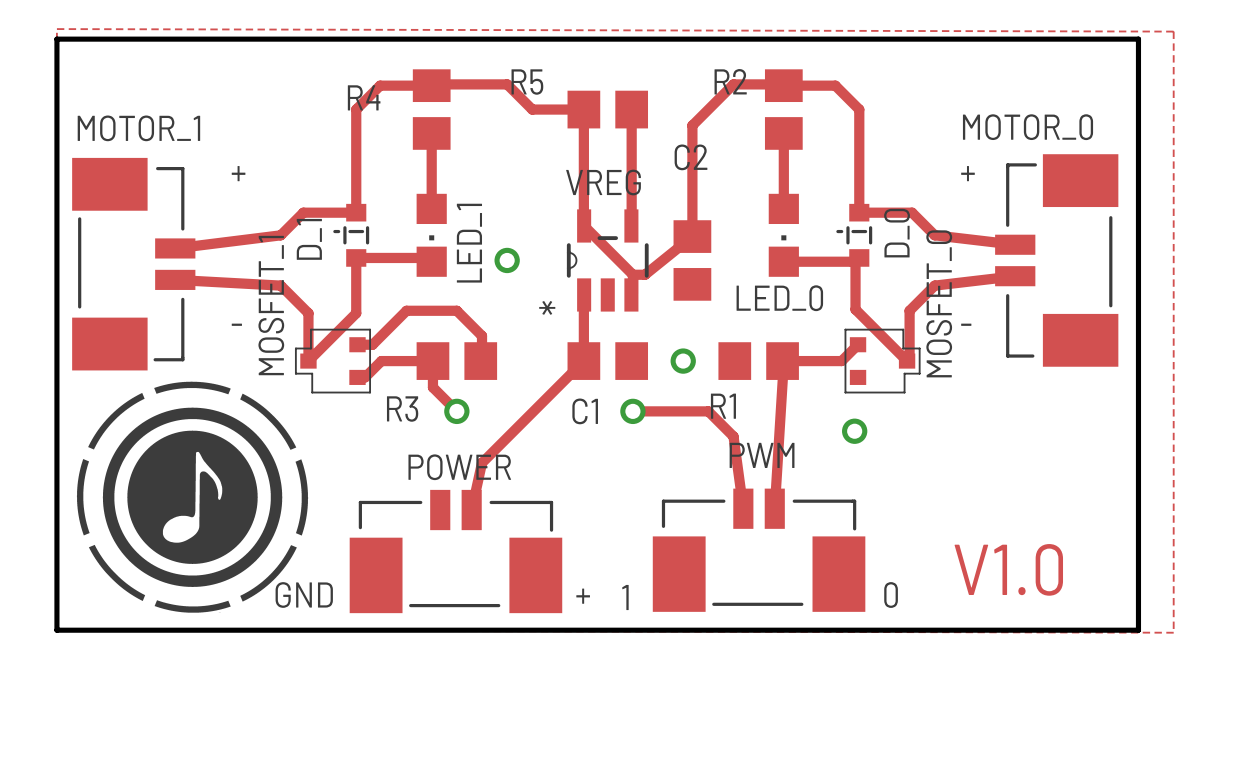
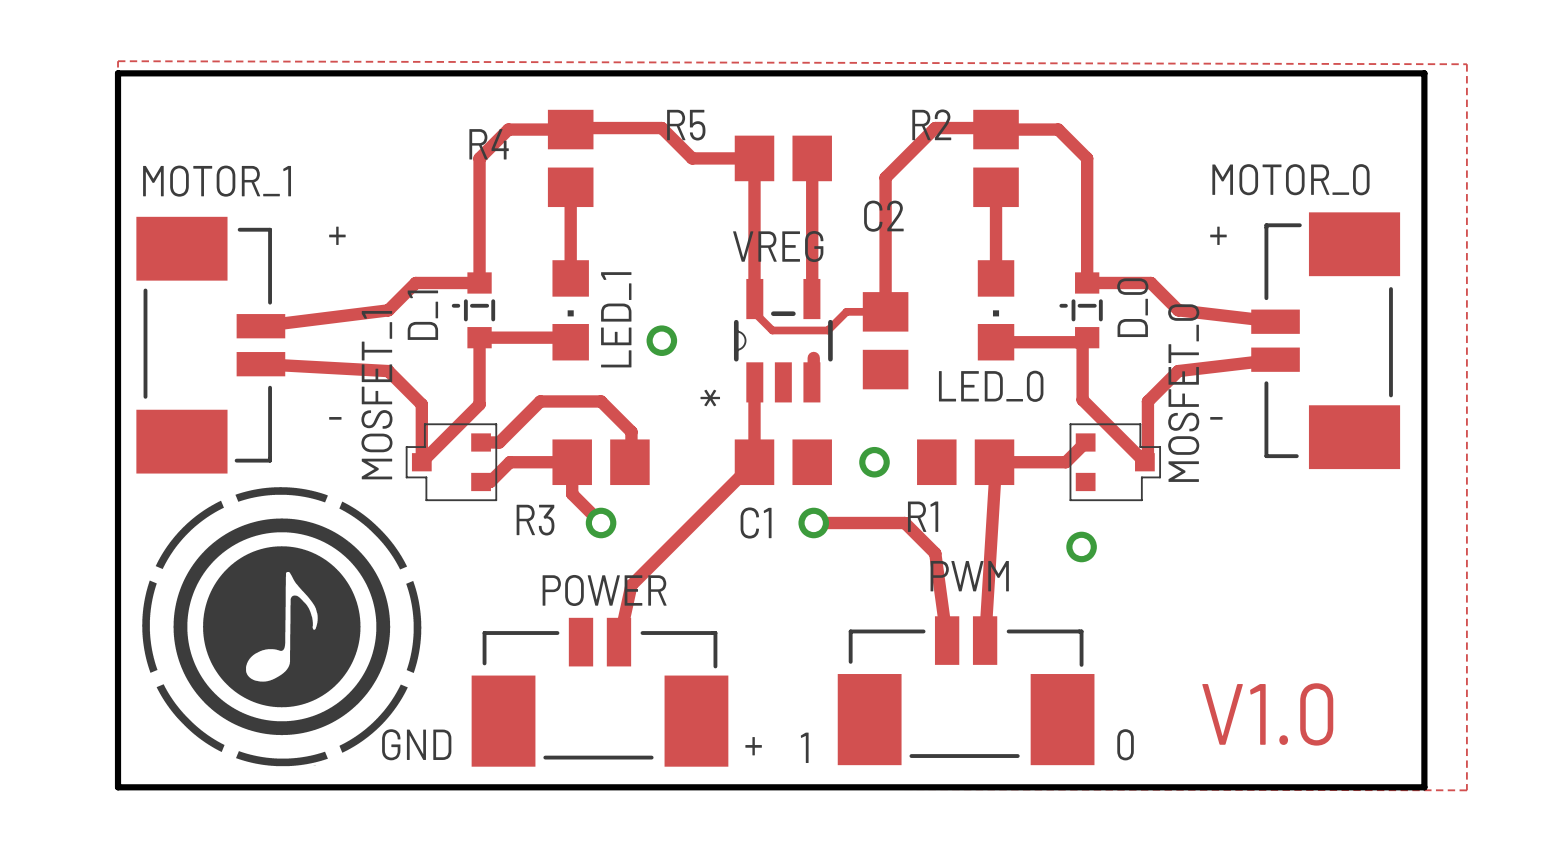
track: (584, 225) (632, 274) (645, 274) (692, 236) -> (754, 312) (772, 330) (827, 330) (846, 311) (885, 311)

